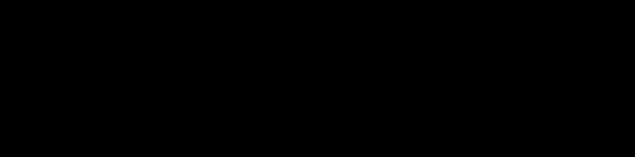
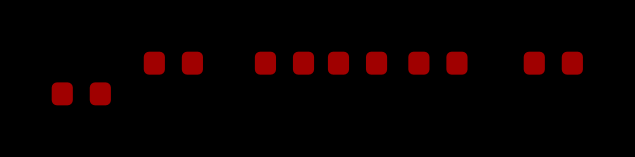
part: none -> (173, 63)
part: none -> (284, 63)
part: none -> (357, 63)
part: none -> (437, 63)
part: none -> (553, 63)
part: none -> (81, 93)

